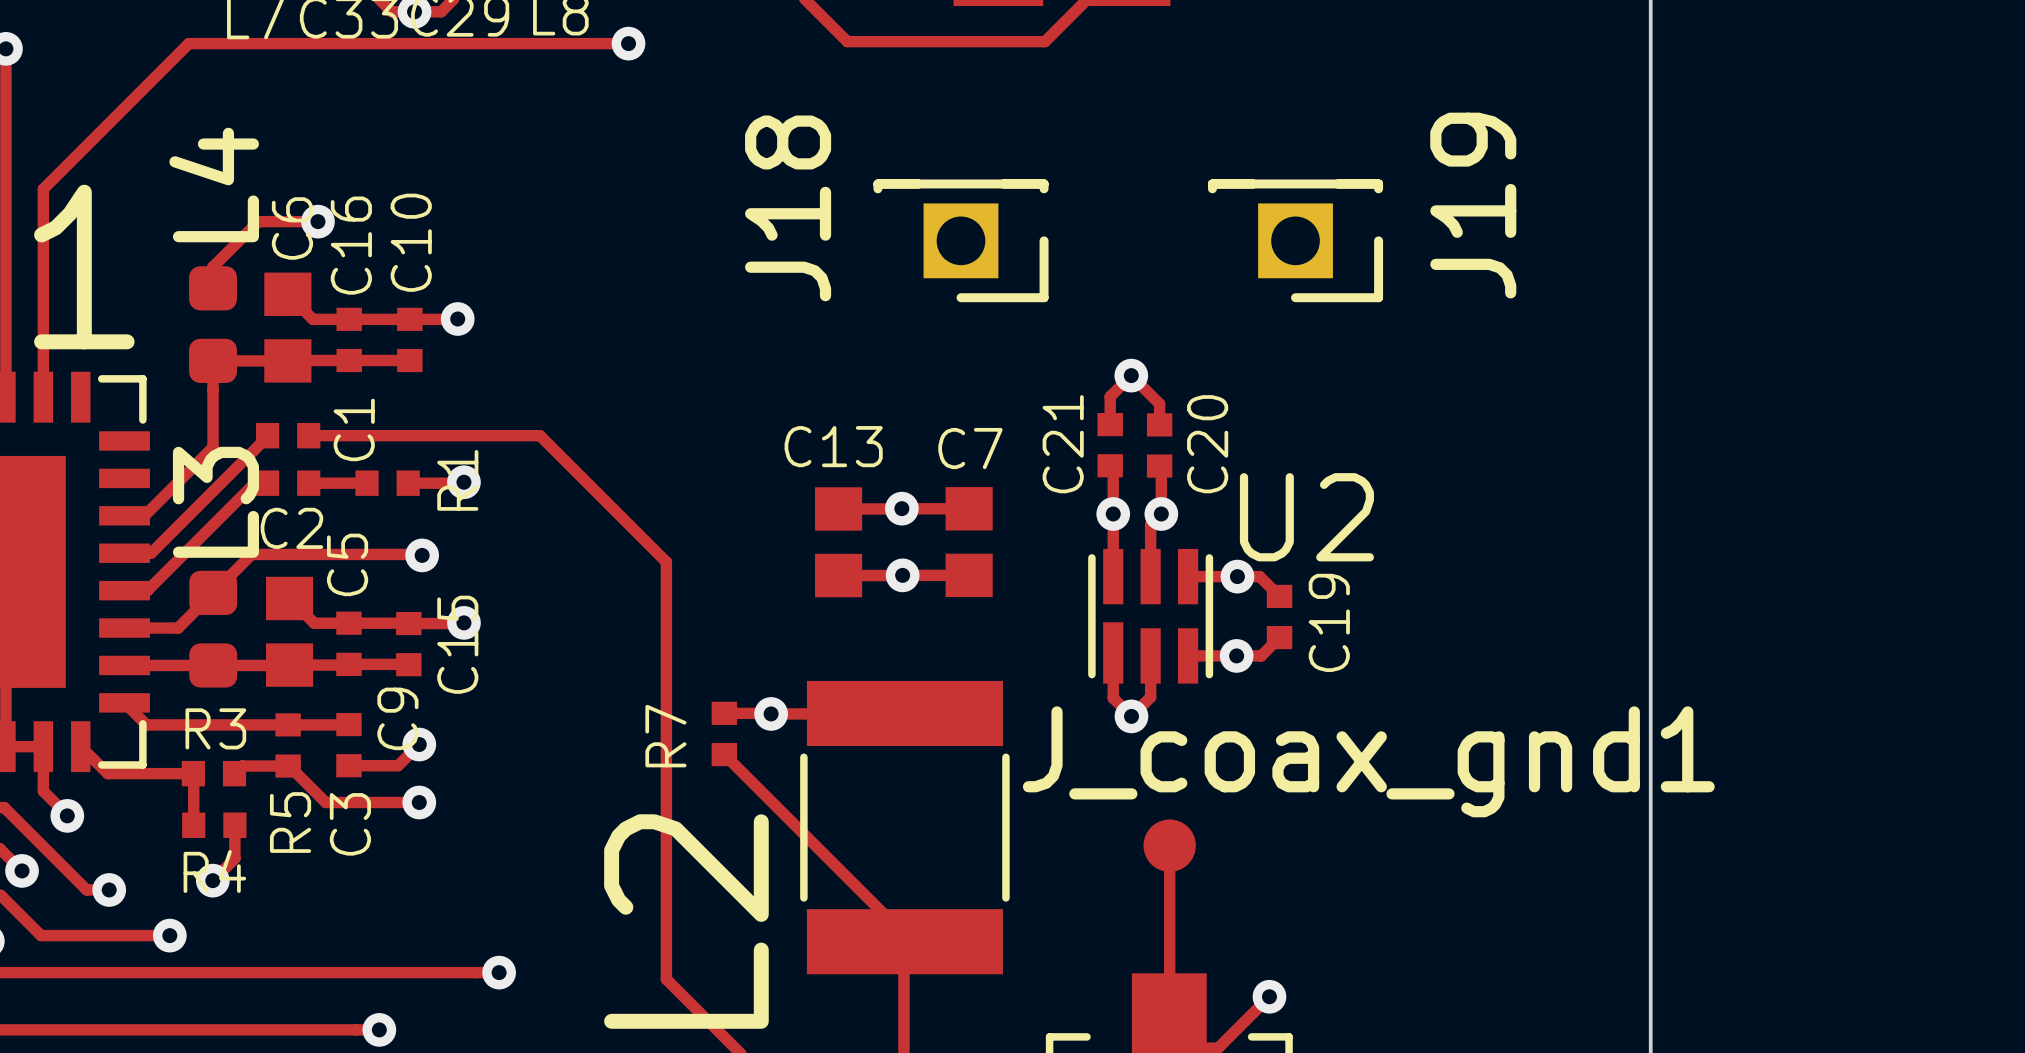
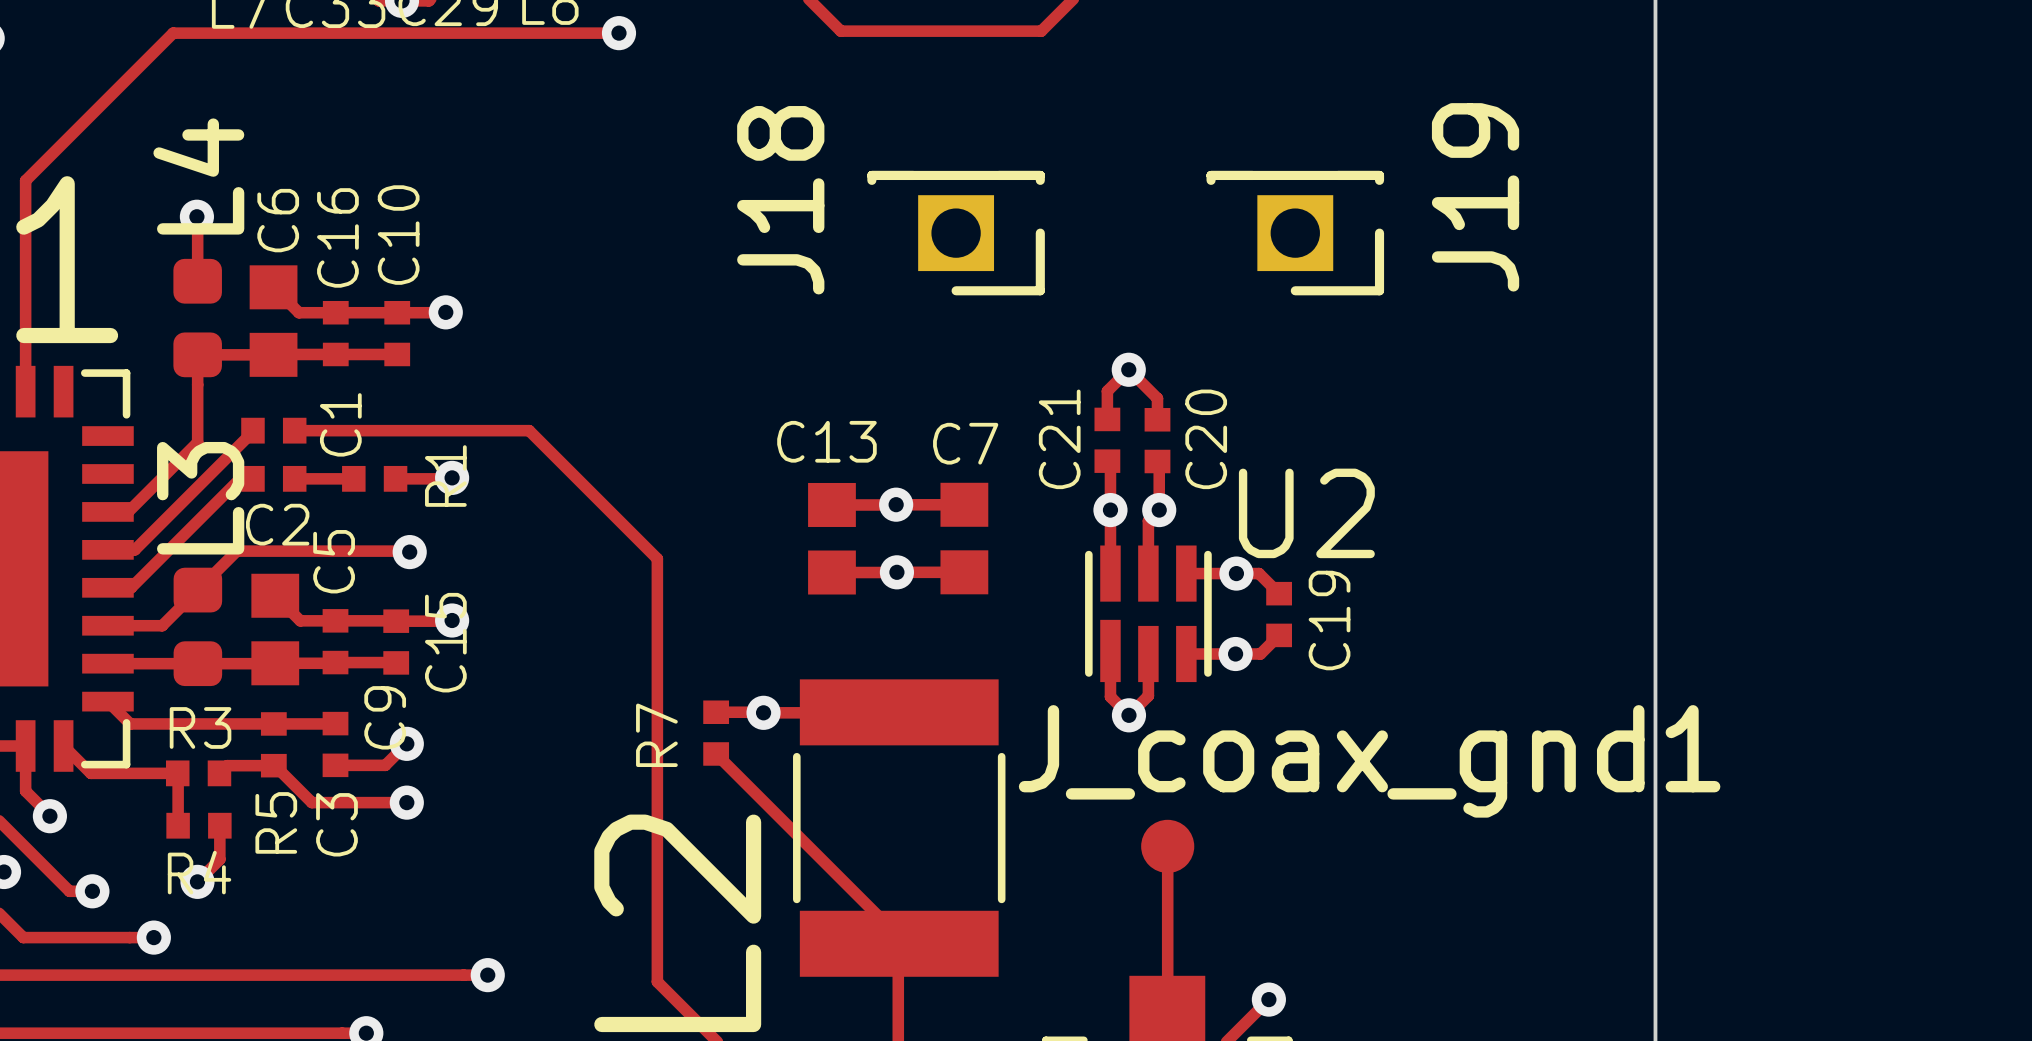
track: (317, 221) (258, 221) (213, 266) -> (197, 217) (197, 259)
via position: (317, 221) -> (196, 216)

